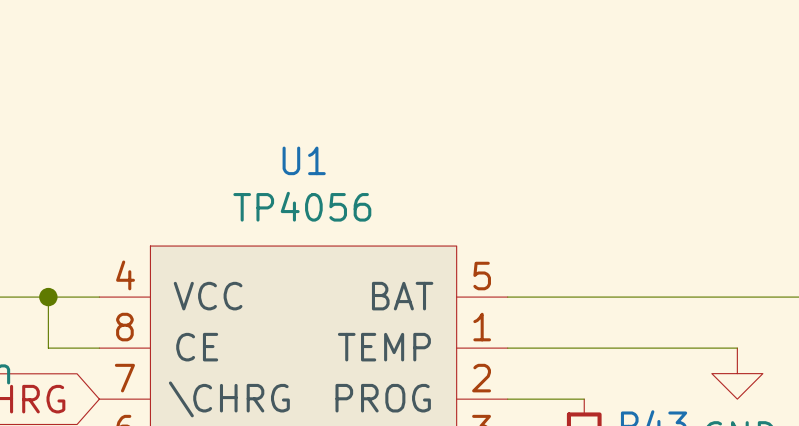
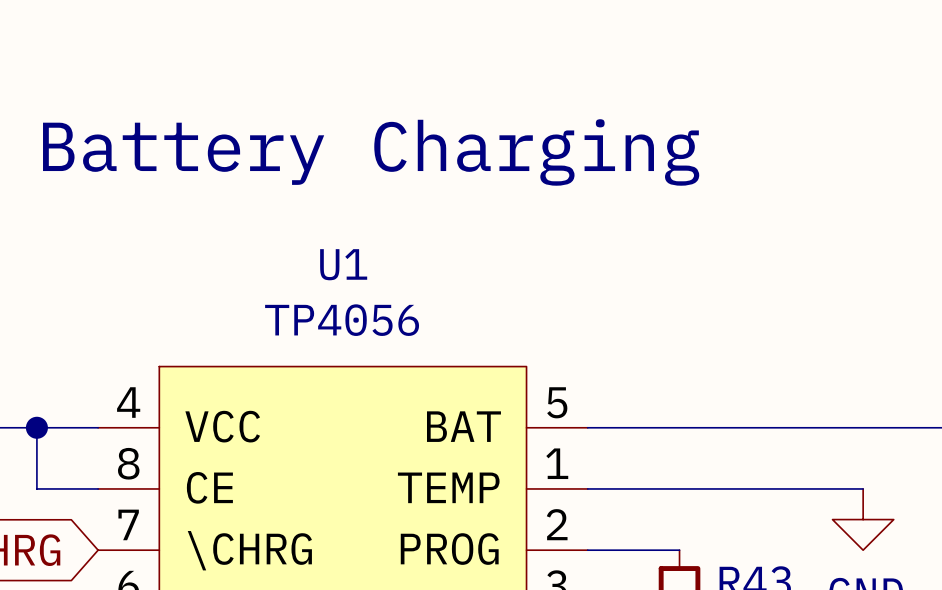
text: none -> Battery Charging (371, 152)

